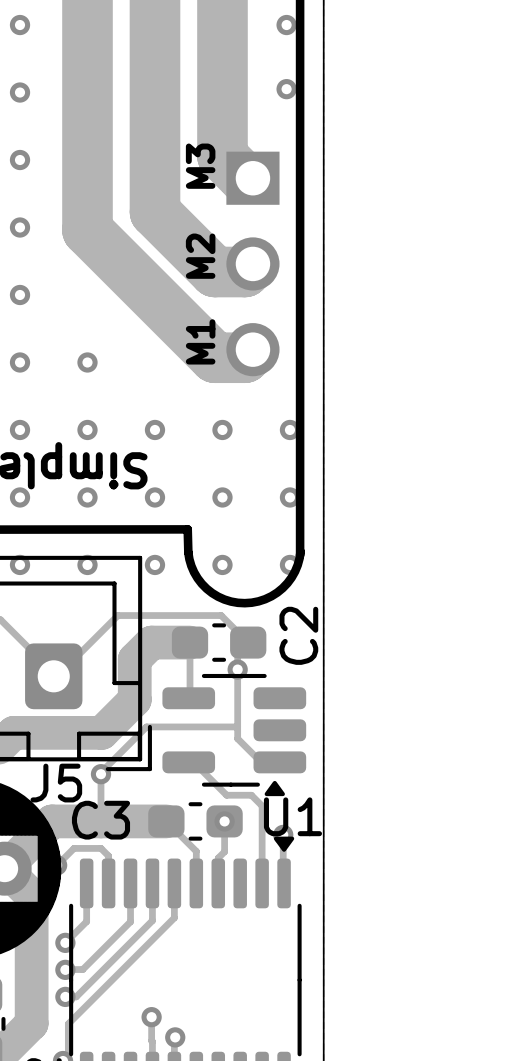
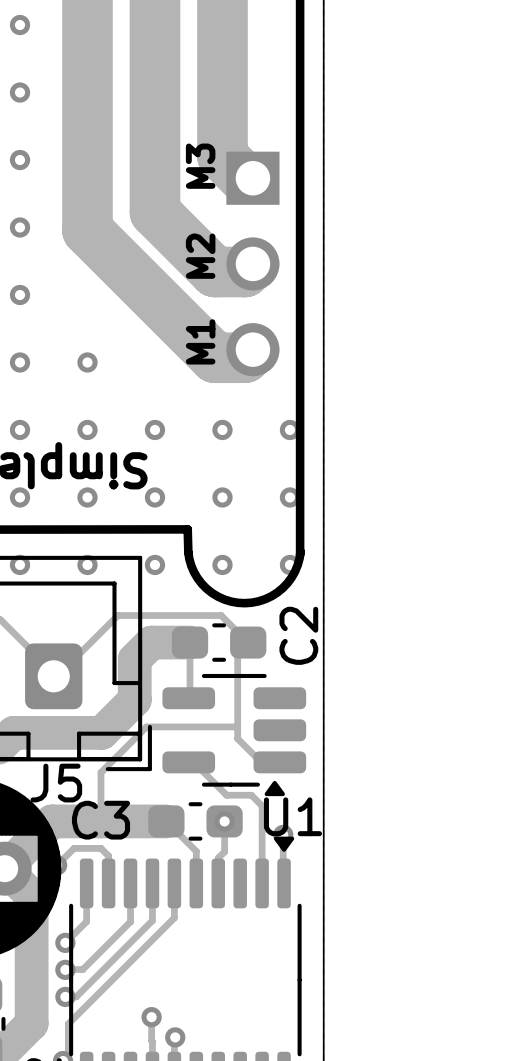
via: (286, 25) -> none
via: (286, 89) -> none
via: (237, 669) -> none
via: (101, 774) -> none

